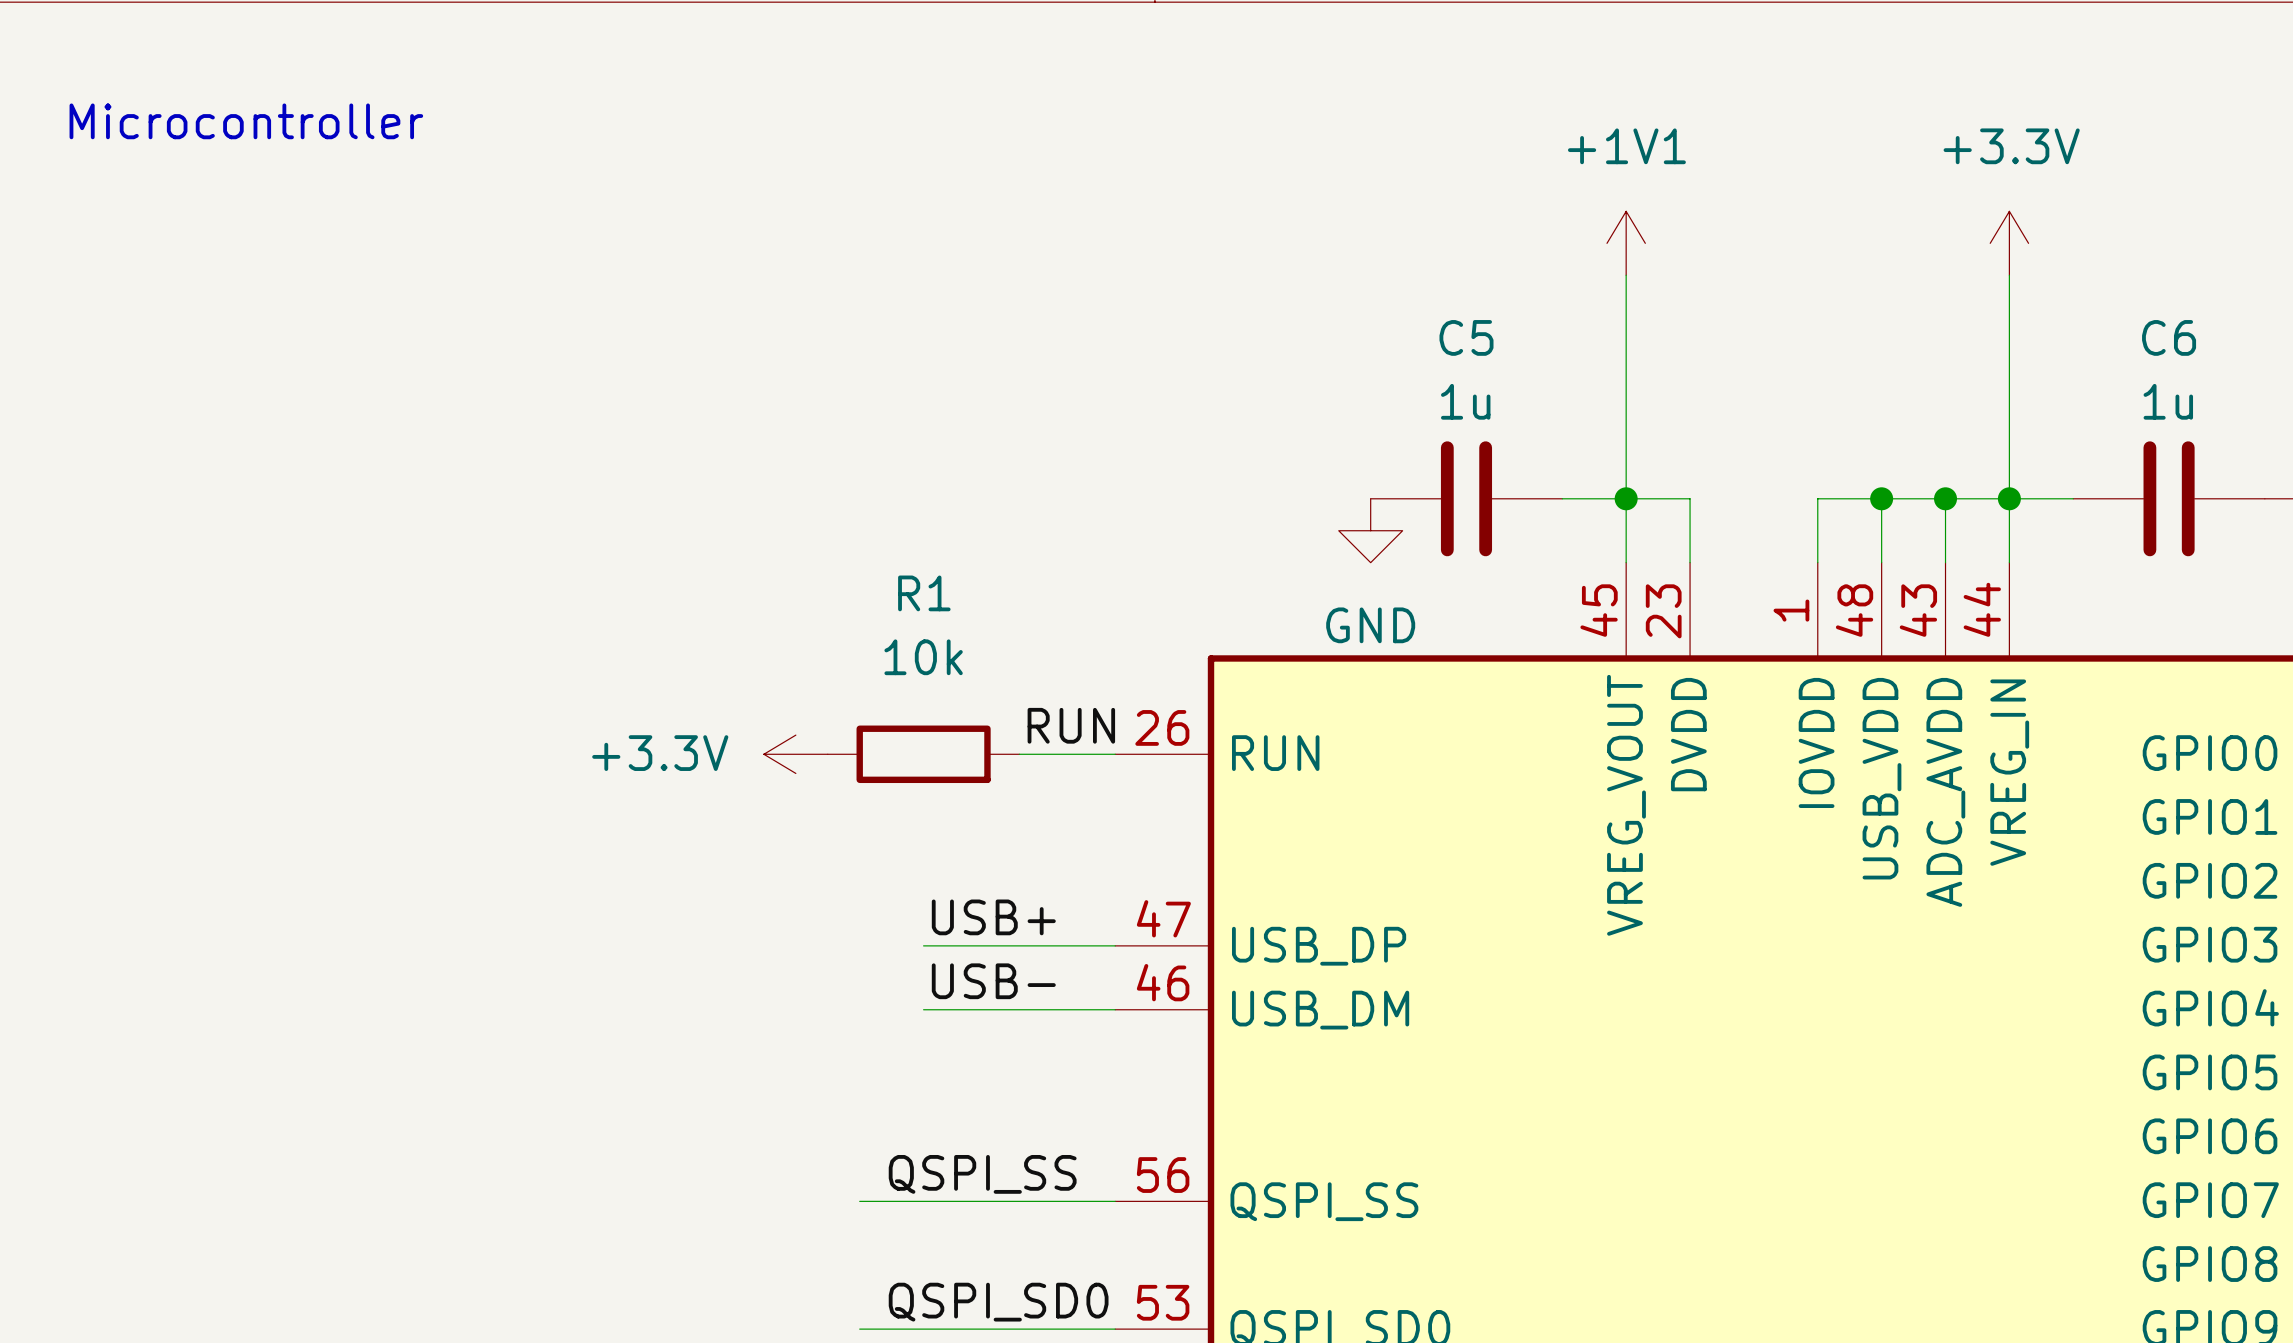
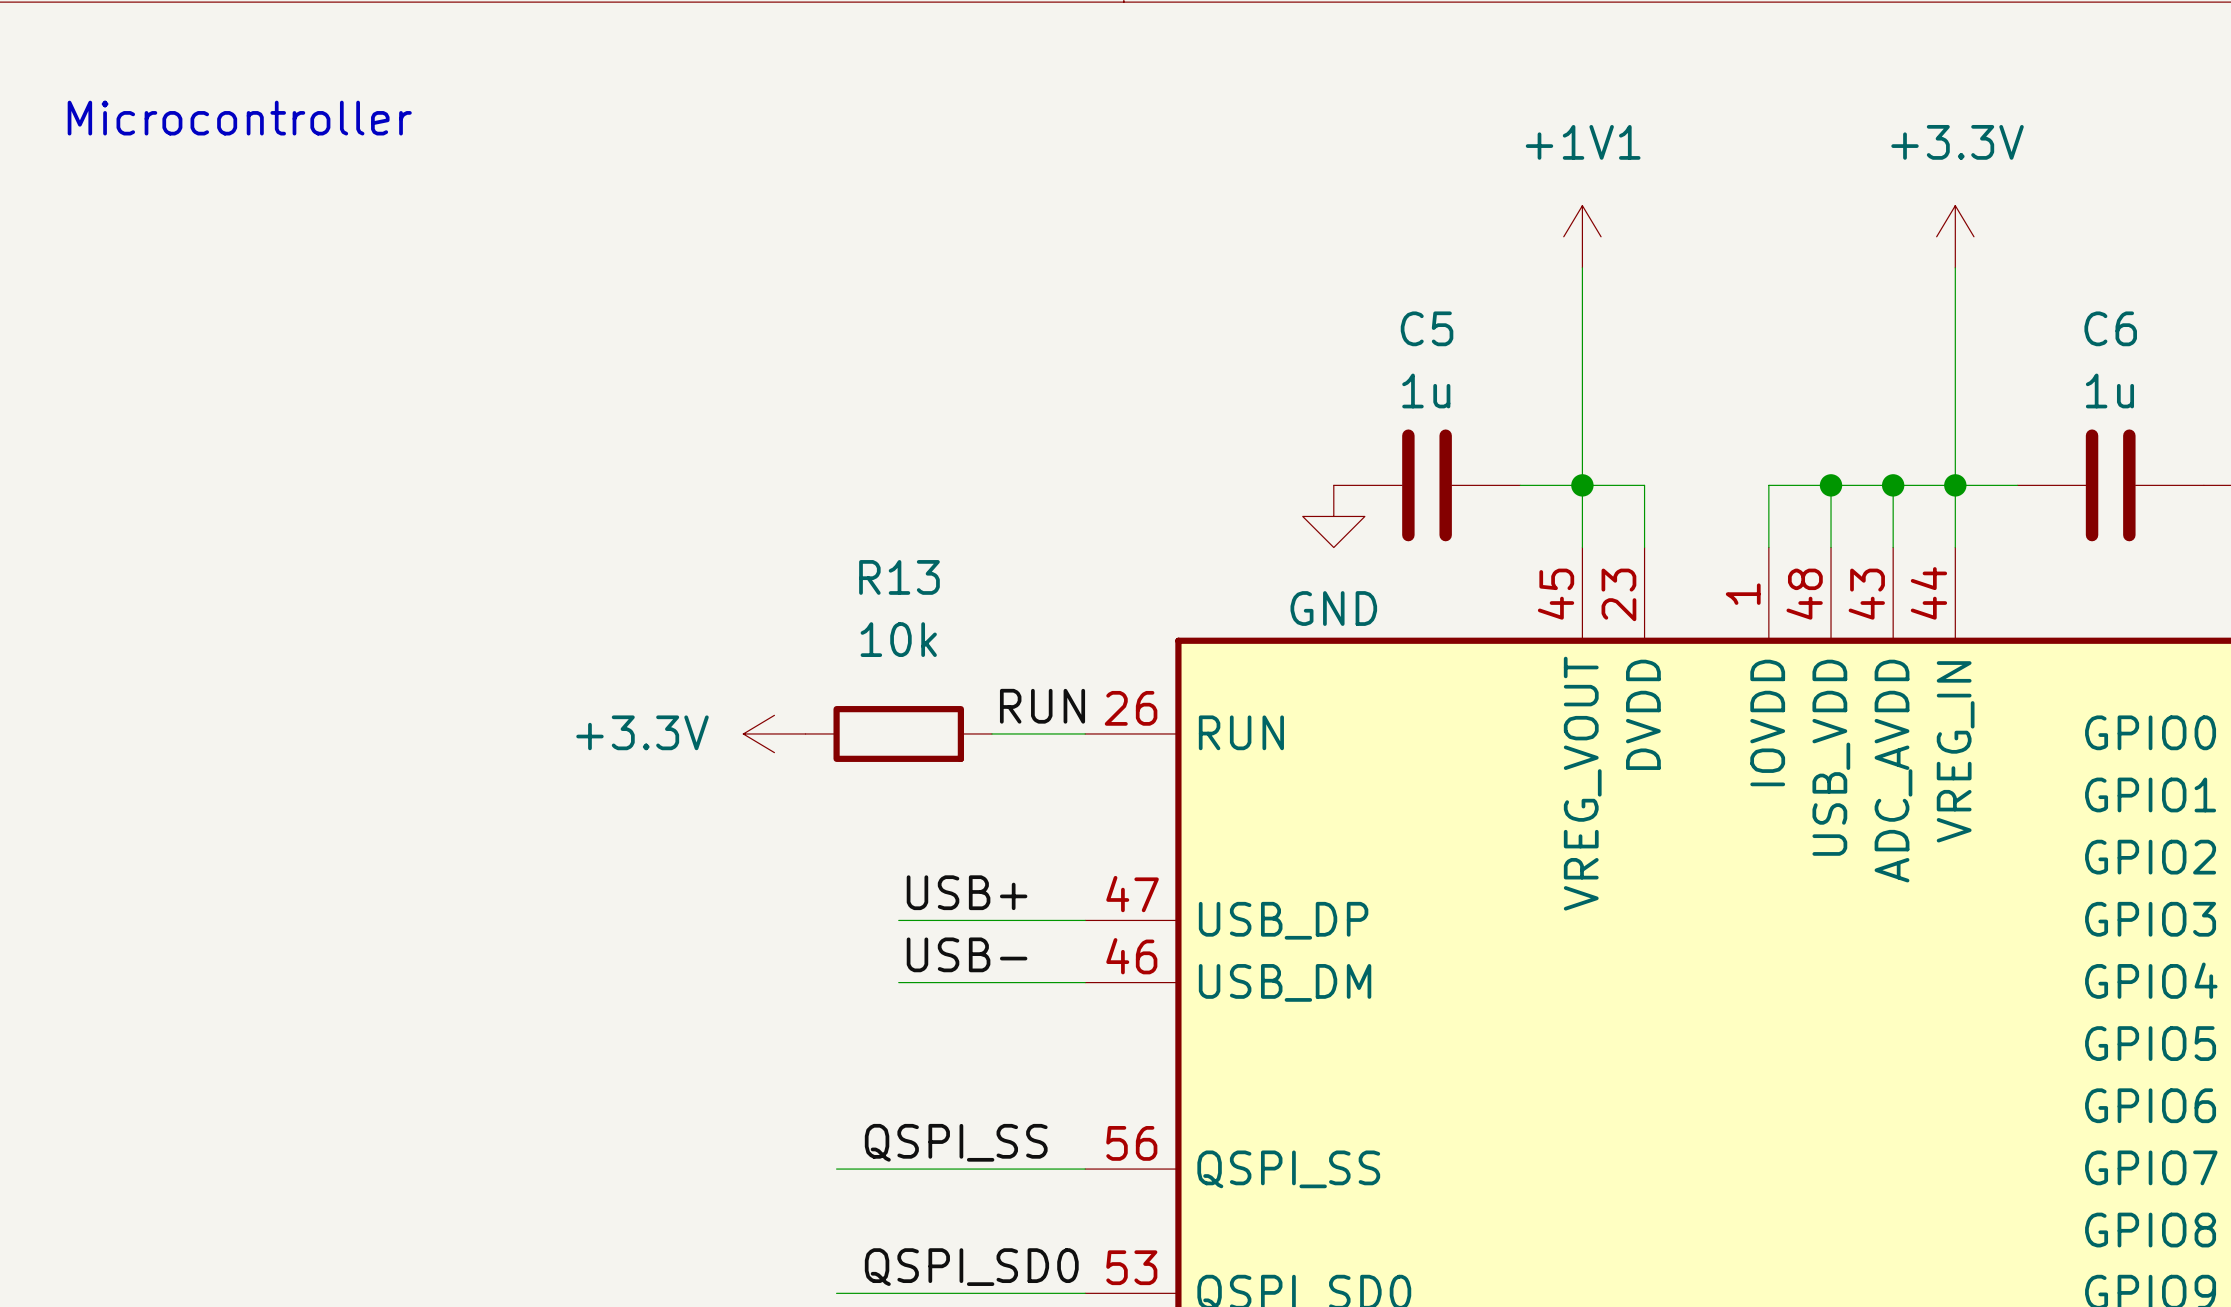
R1 name: R1 (924, 593) -> R13 (899, 577)

